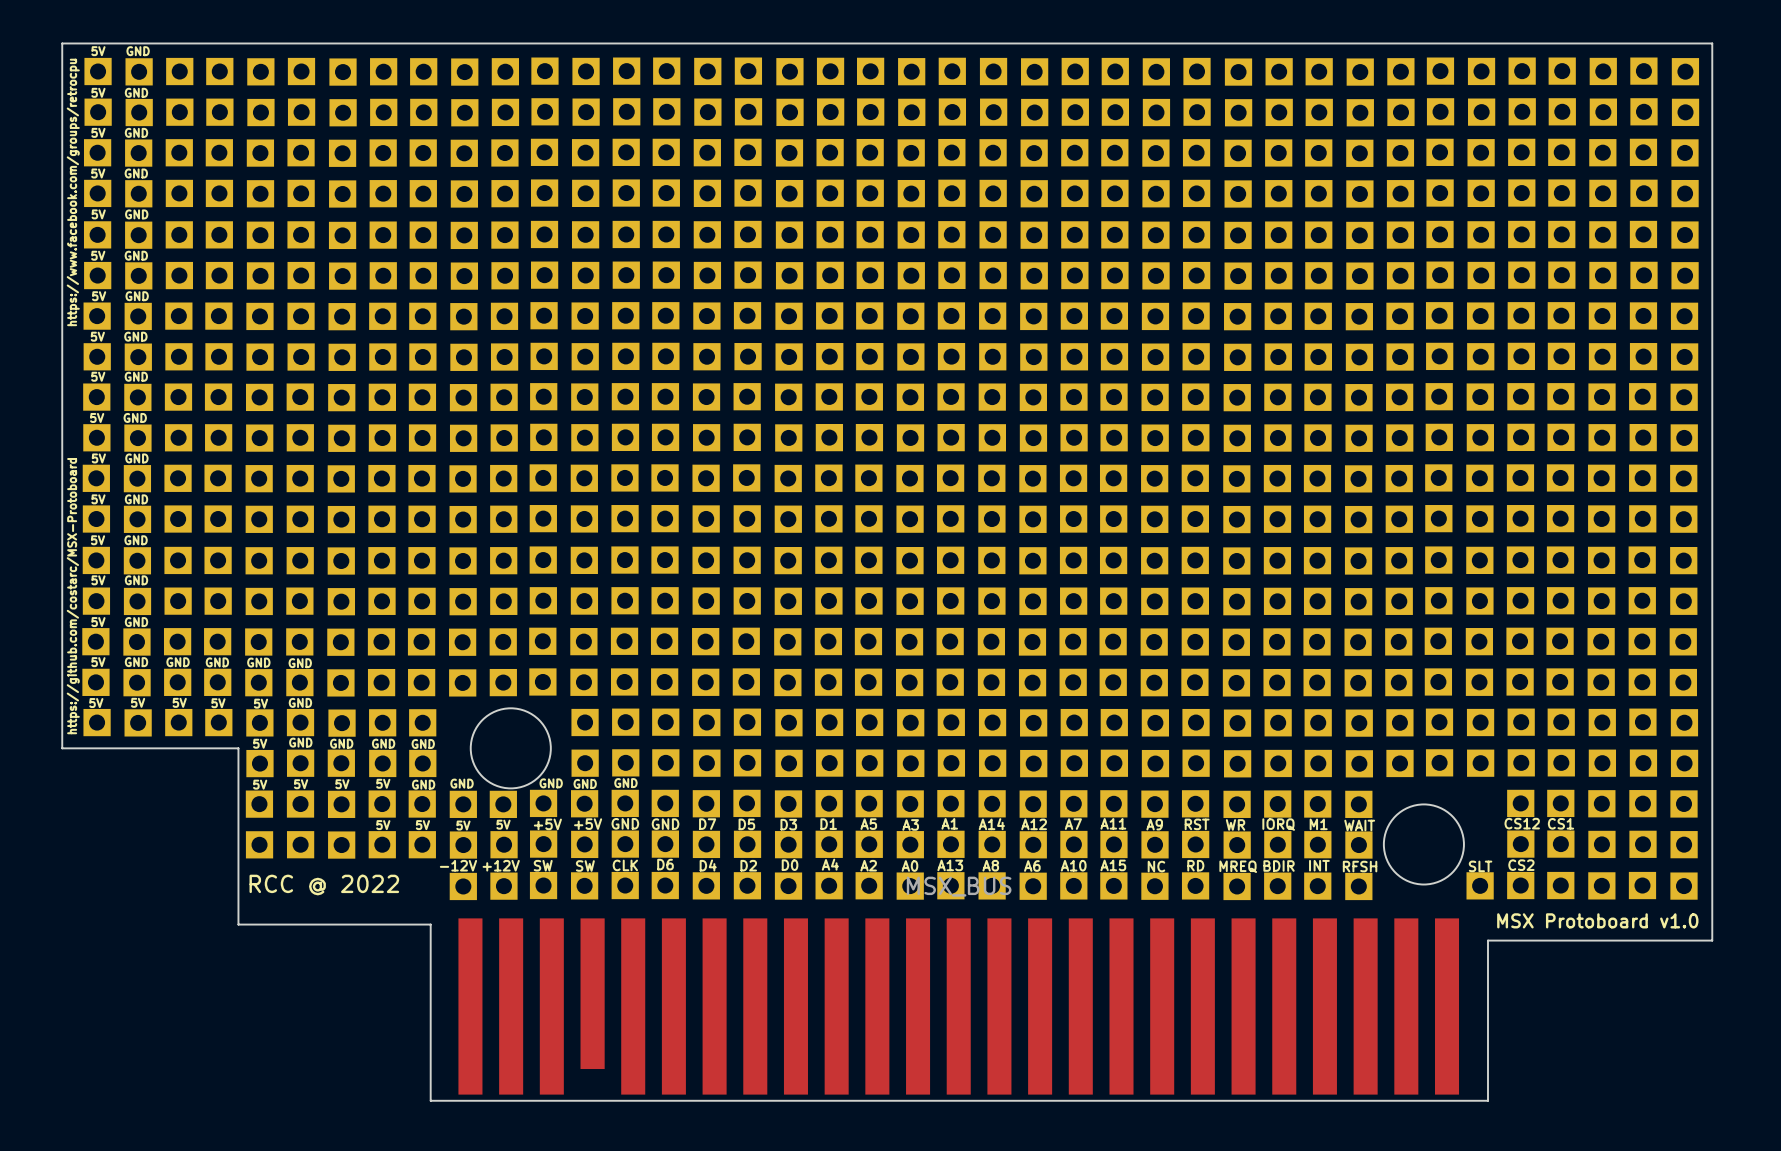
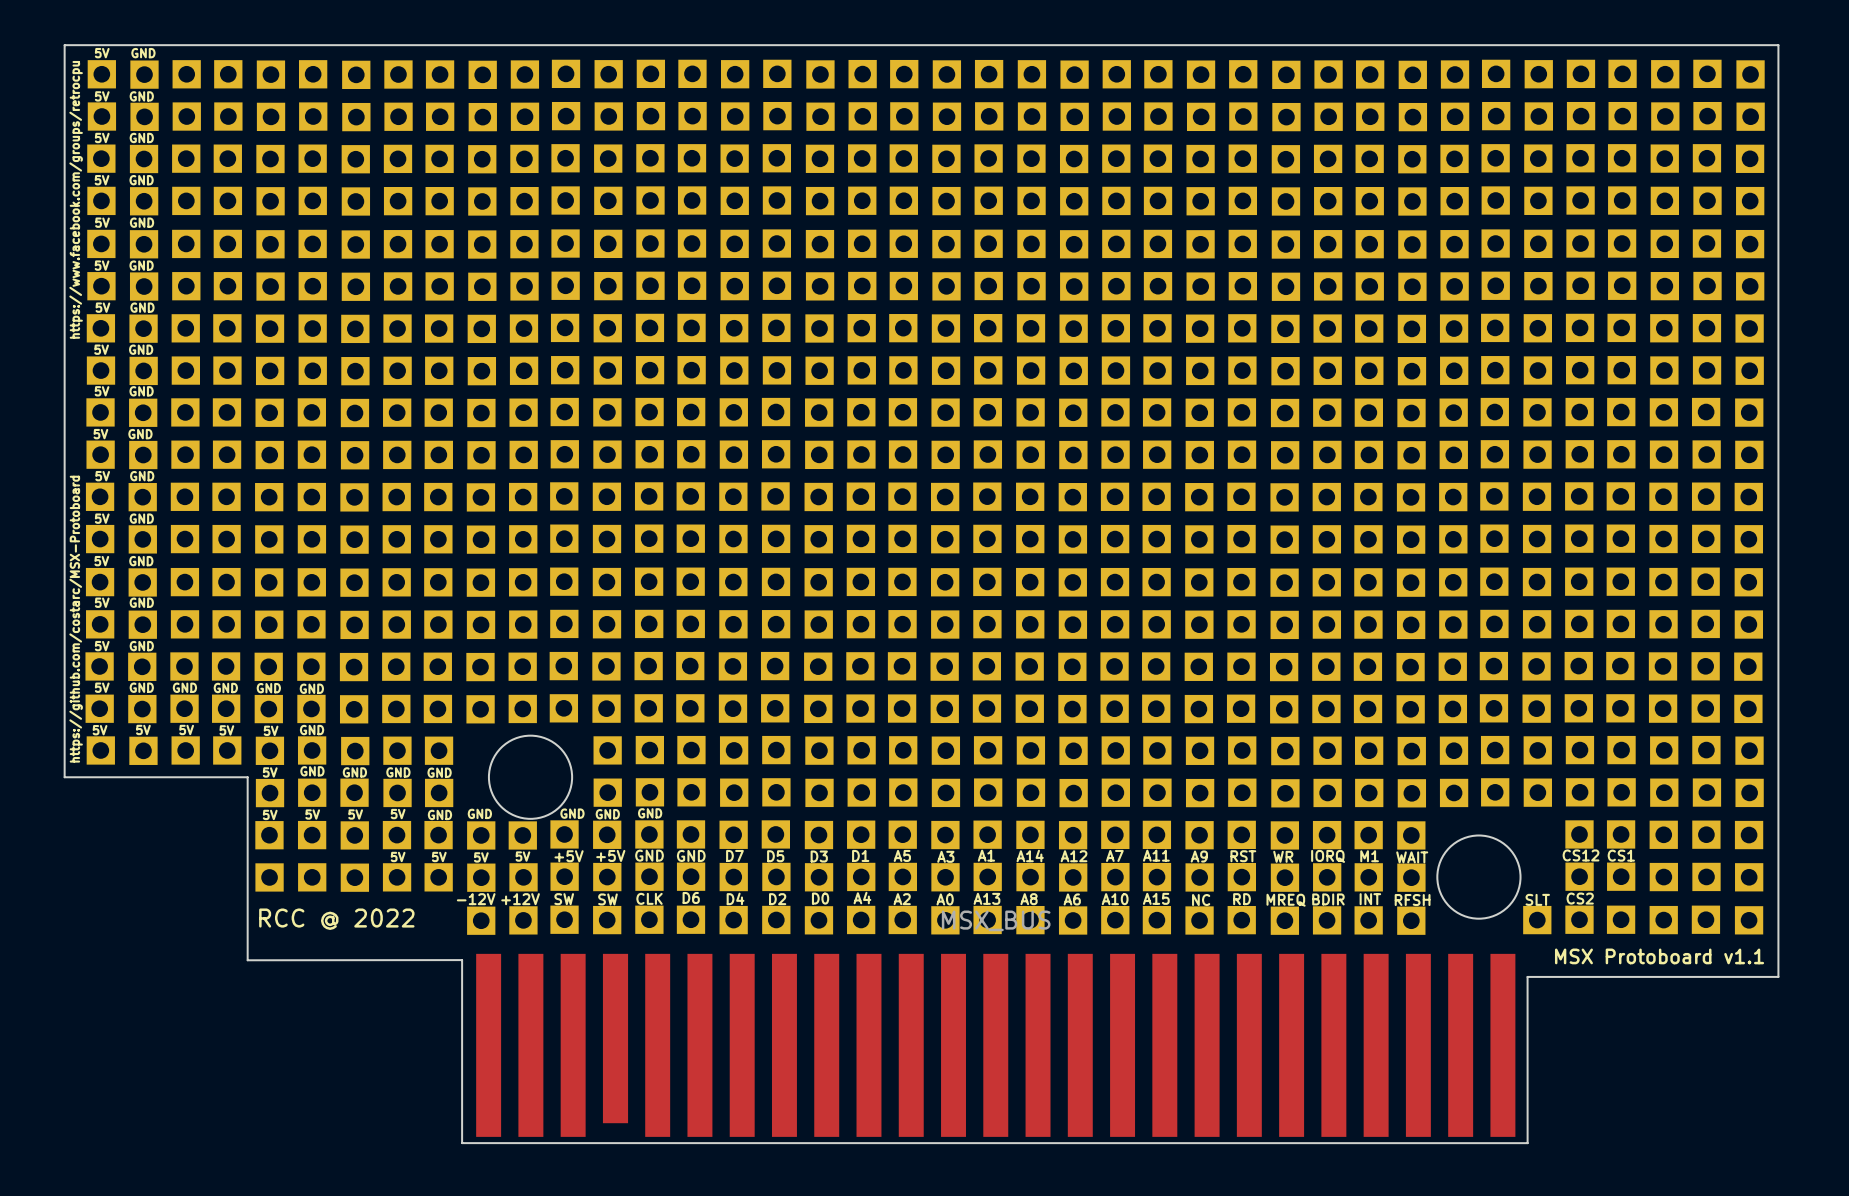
part footprint: [61, 42, 1714, 1102] -> [63, 44, 1780, 1145]
text: MSX Protoboard v1.0 (1597, 920) -> MSX Protoboard v1.1 (1659, 956)

